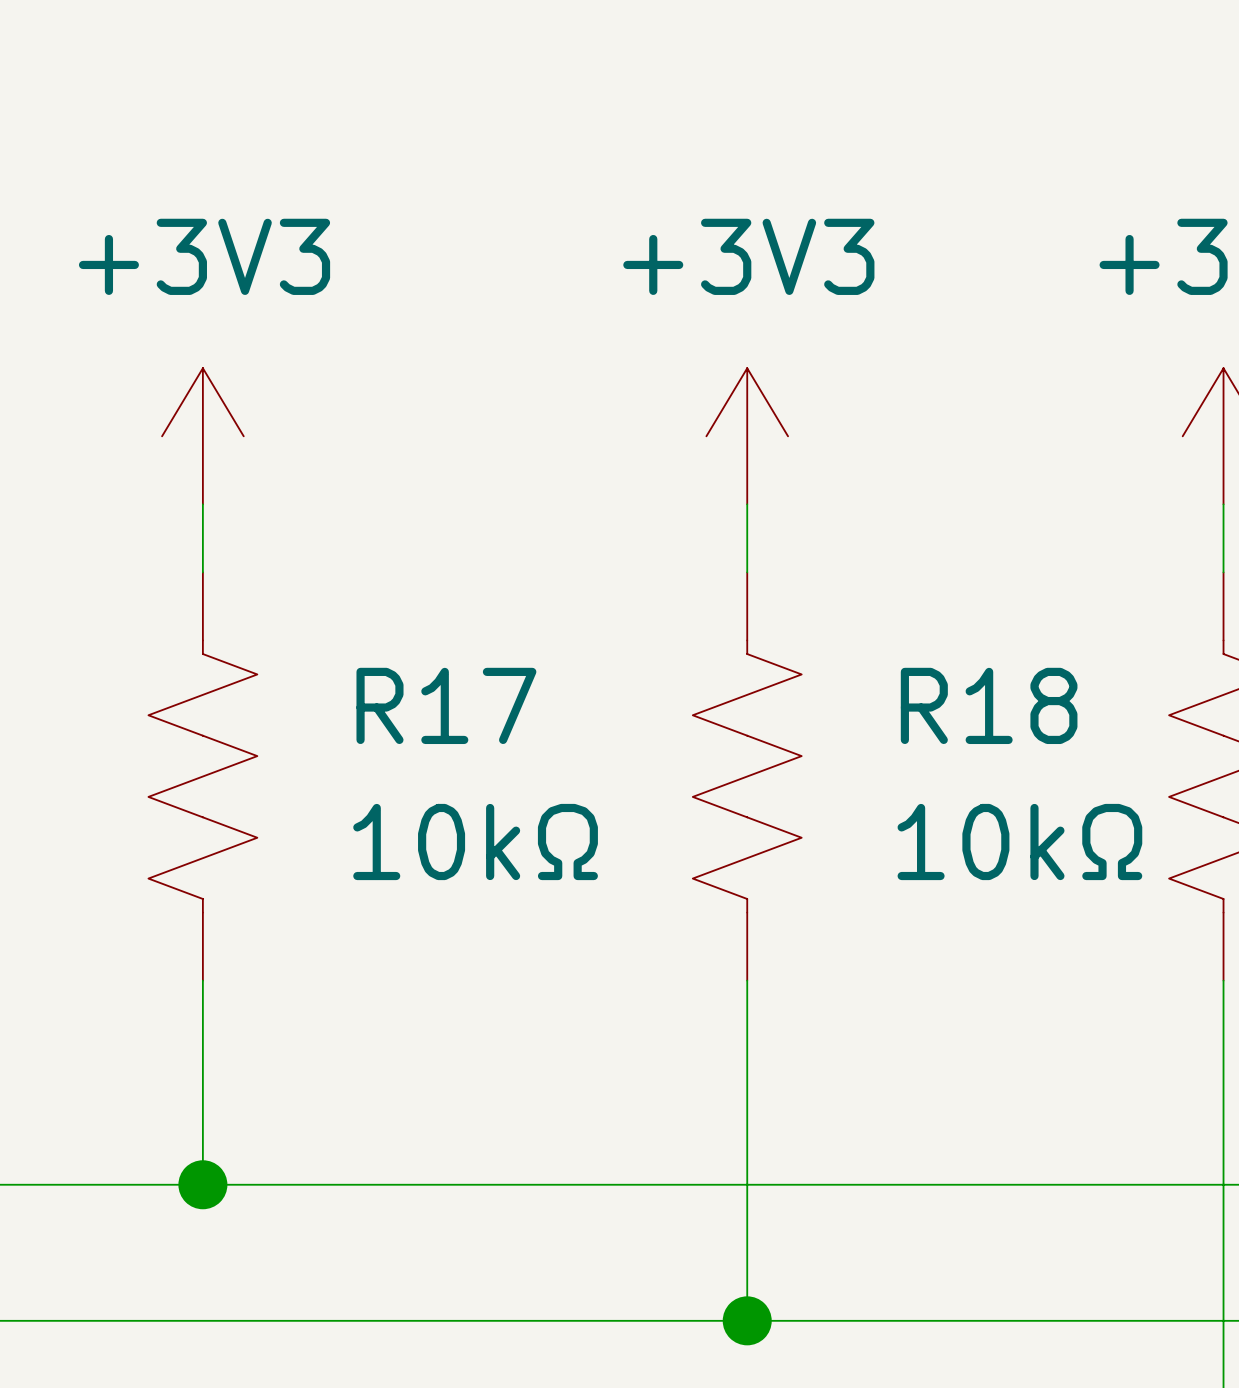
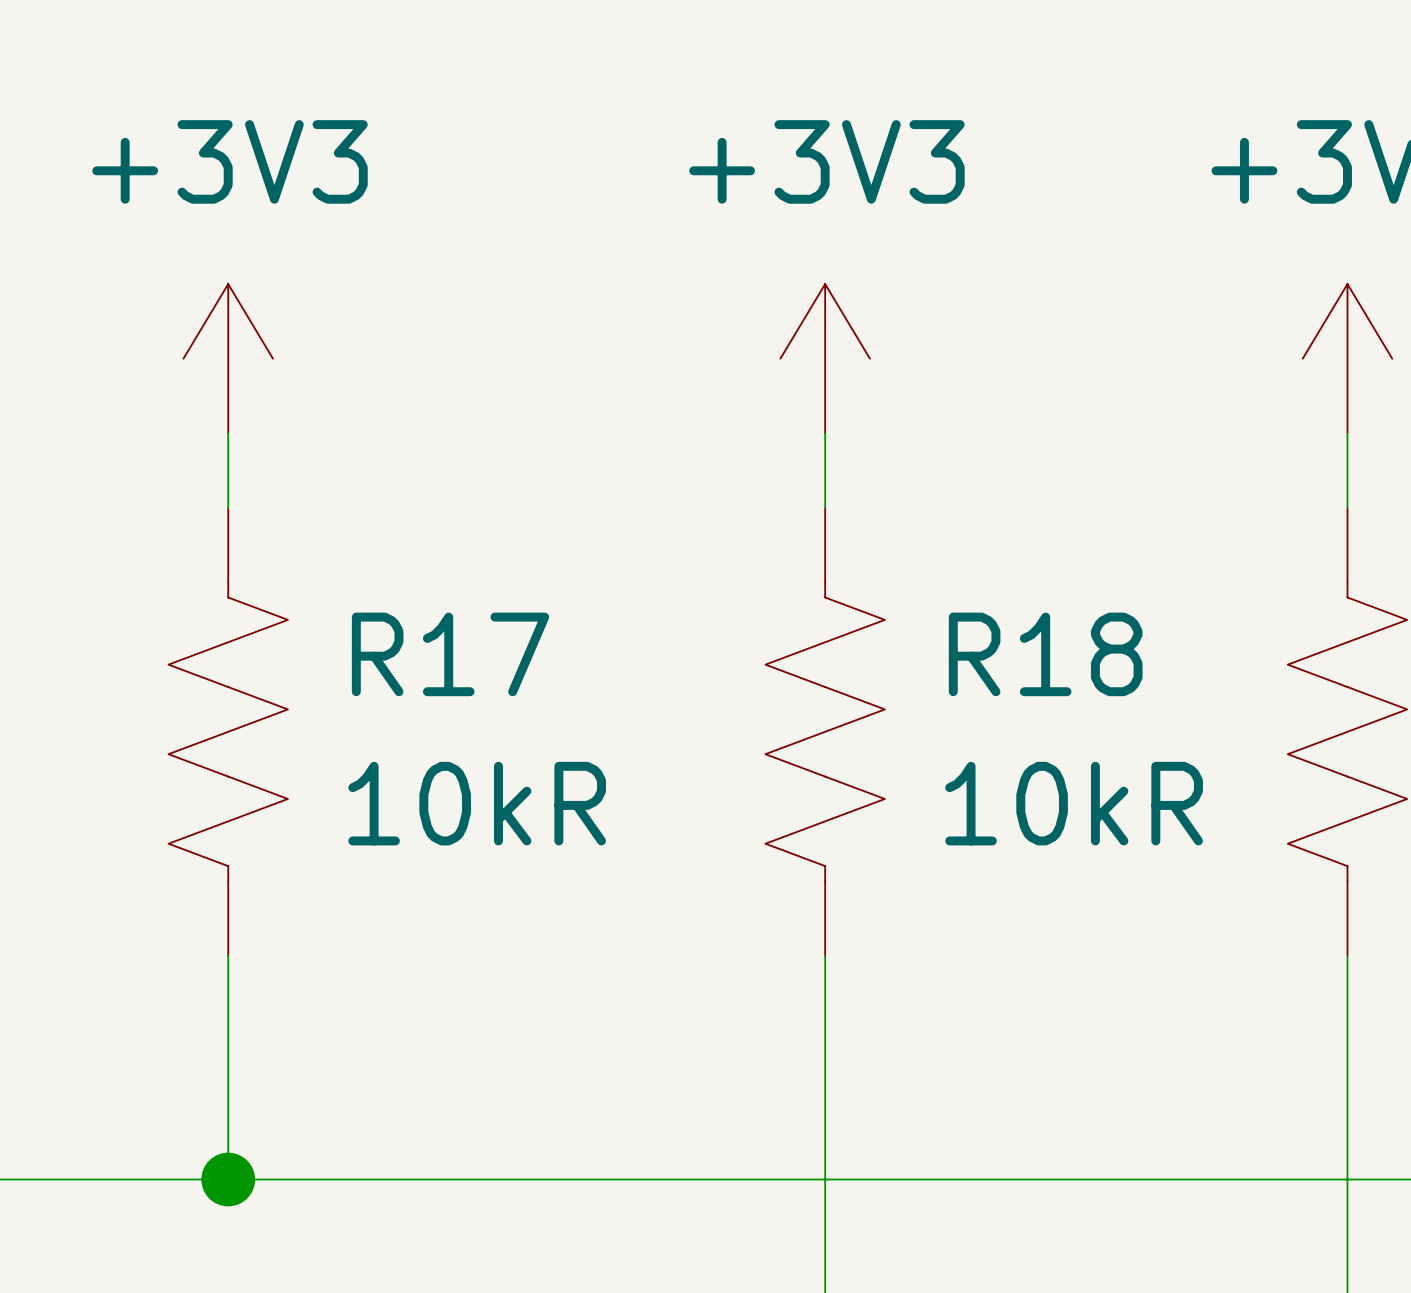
R17 name position: R17 (446, 705) -> R17 (450, 654)
R18 name position: R18 (989, 705) -> R18 (1045, 654)
R17 value: 10kΩ (475, 842) -> 10kR (477, 803)
R18 value: 10kΩ (1019, 842) -> 10kR (1074, 803)

